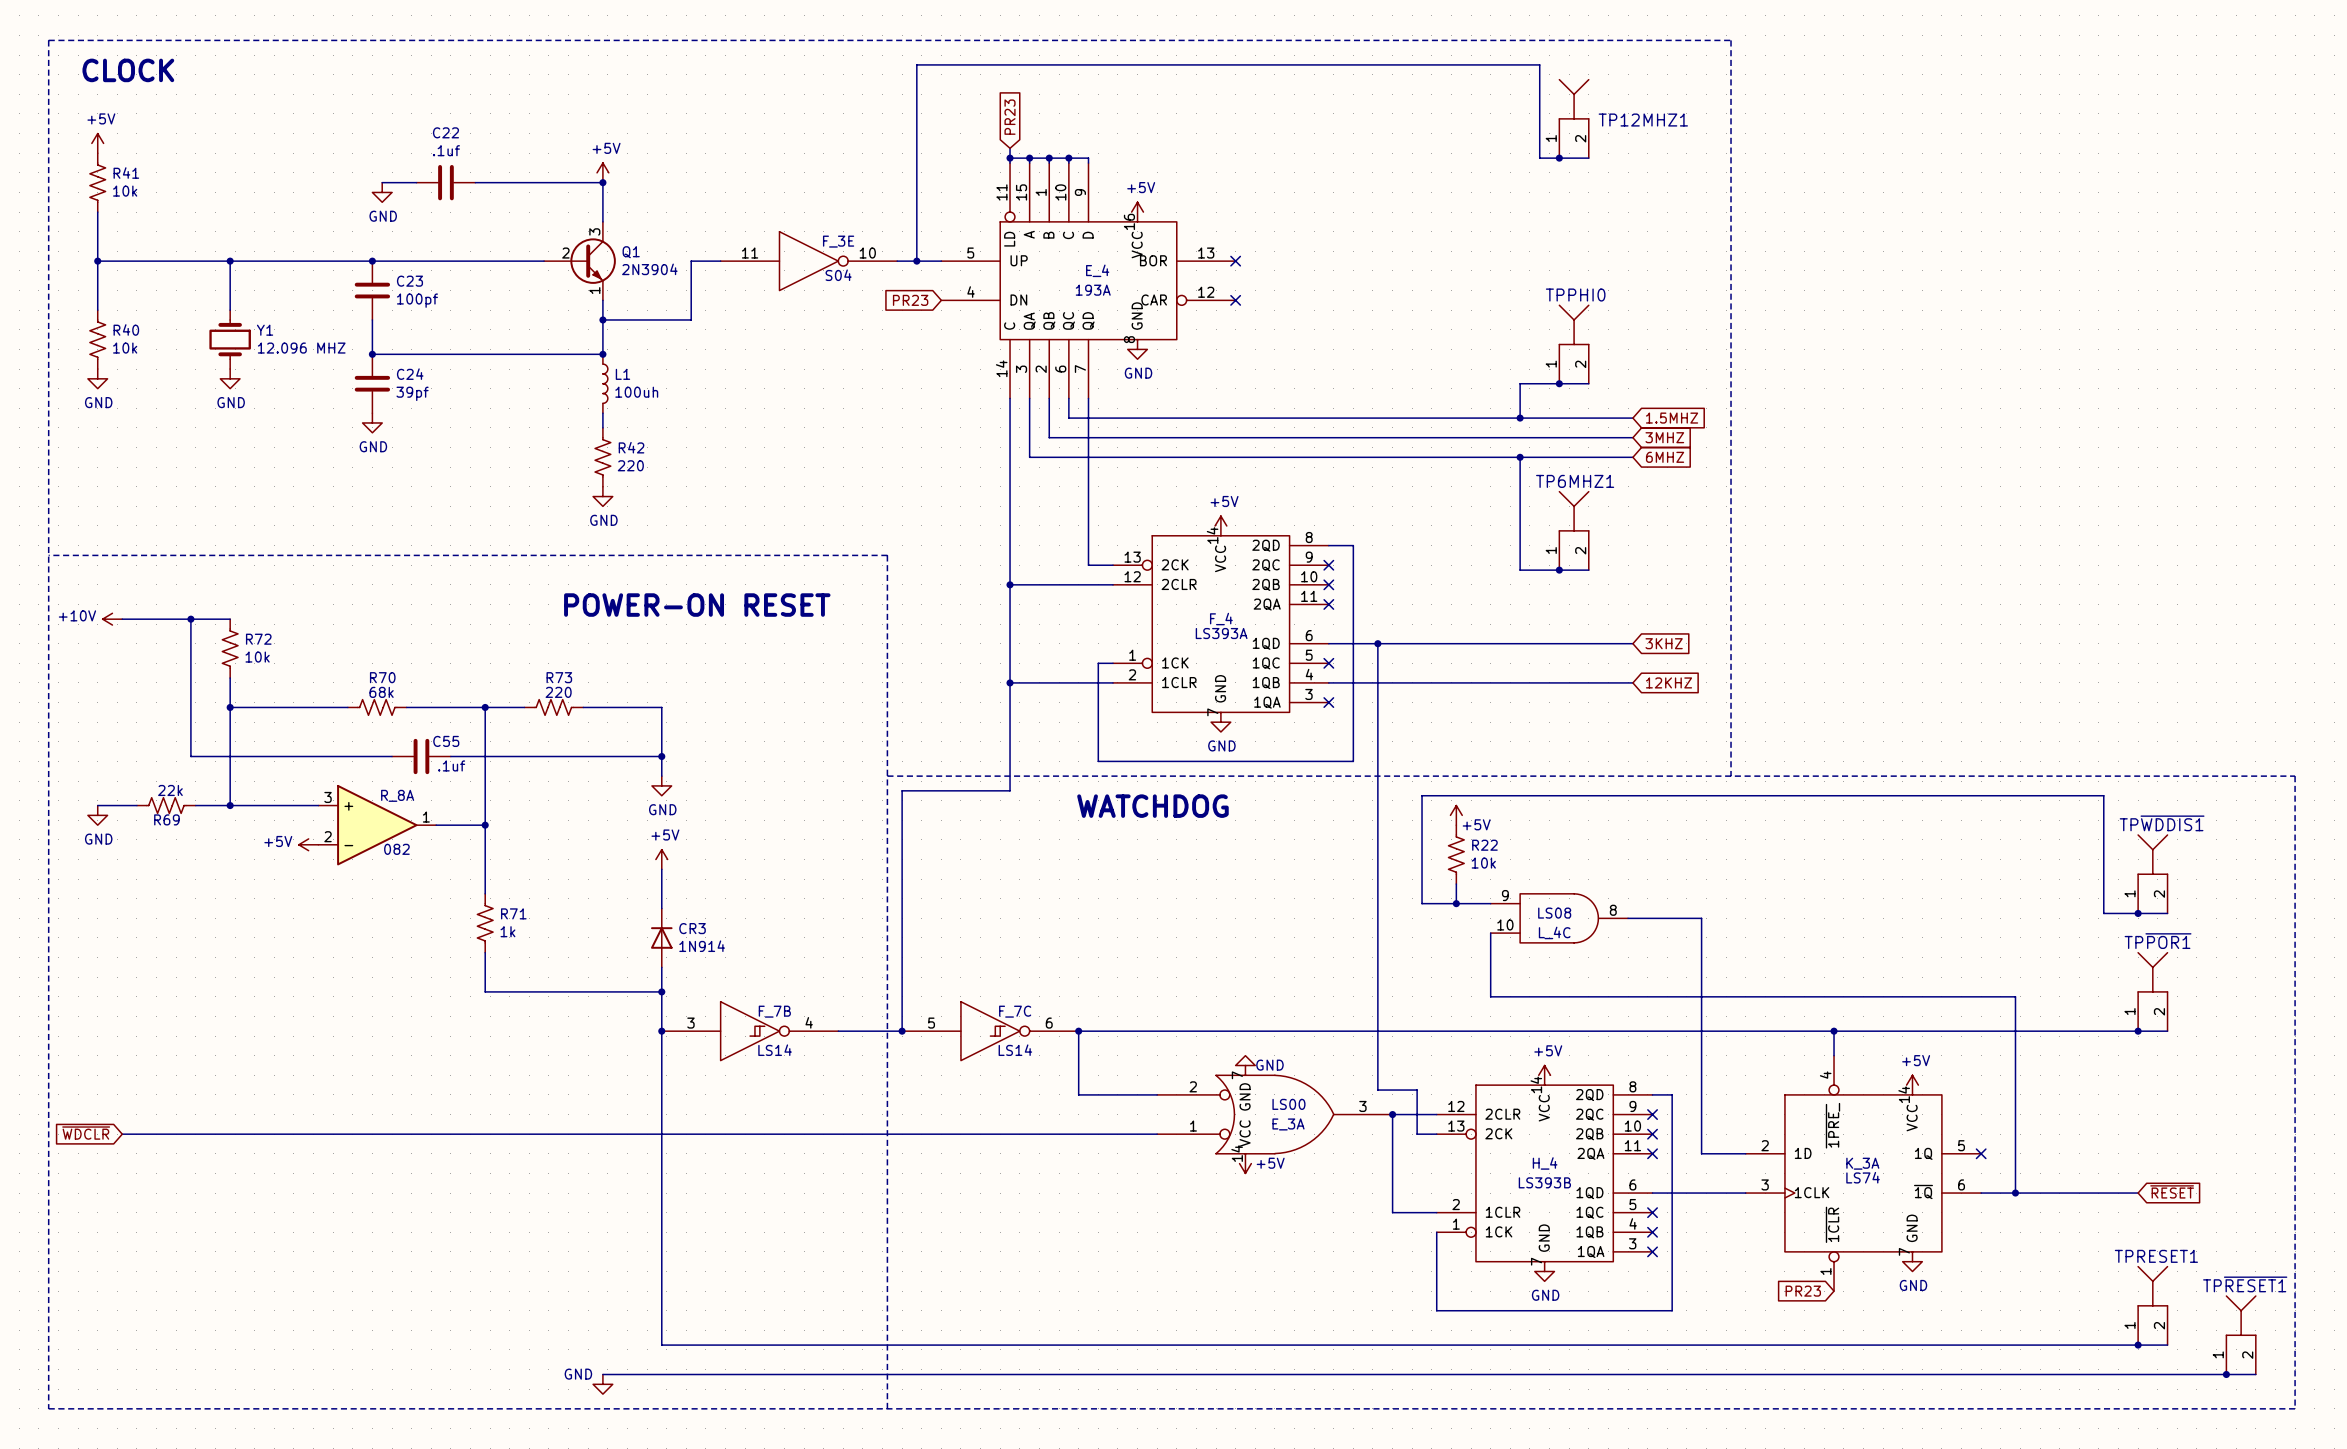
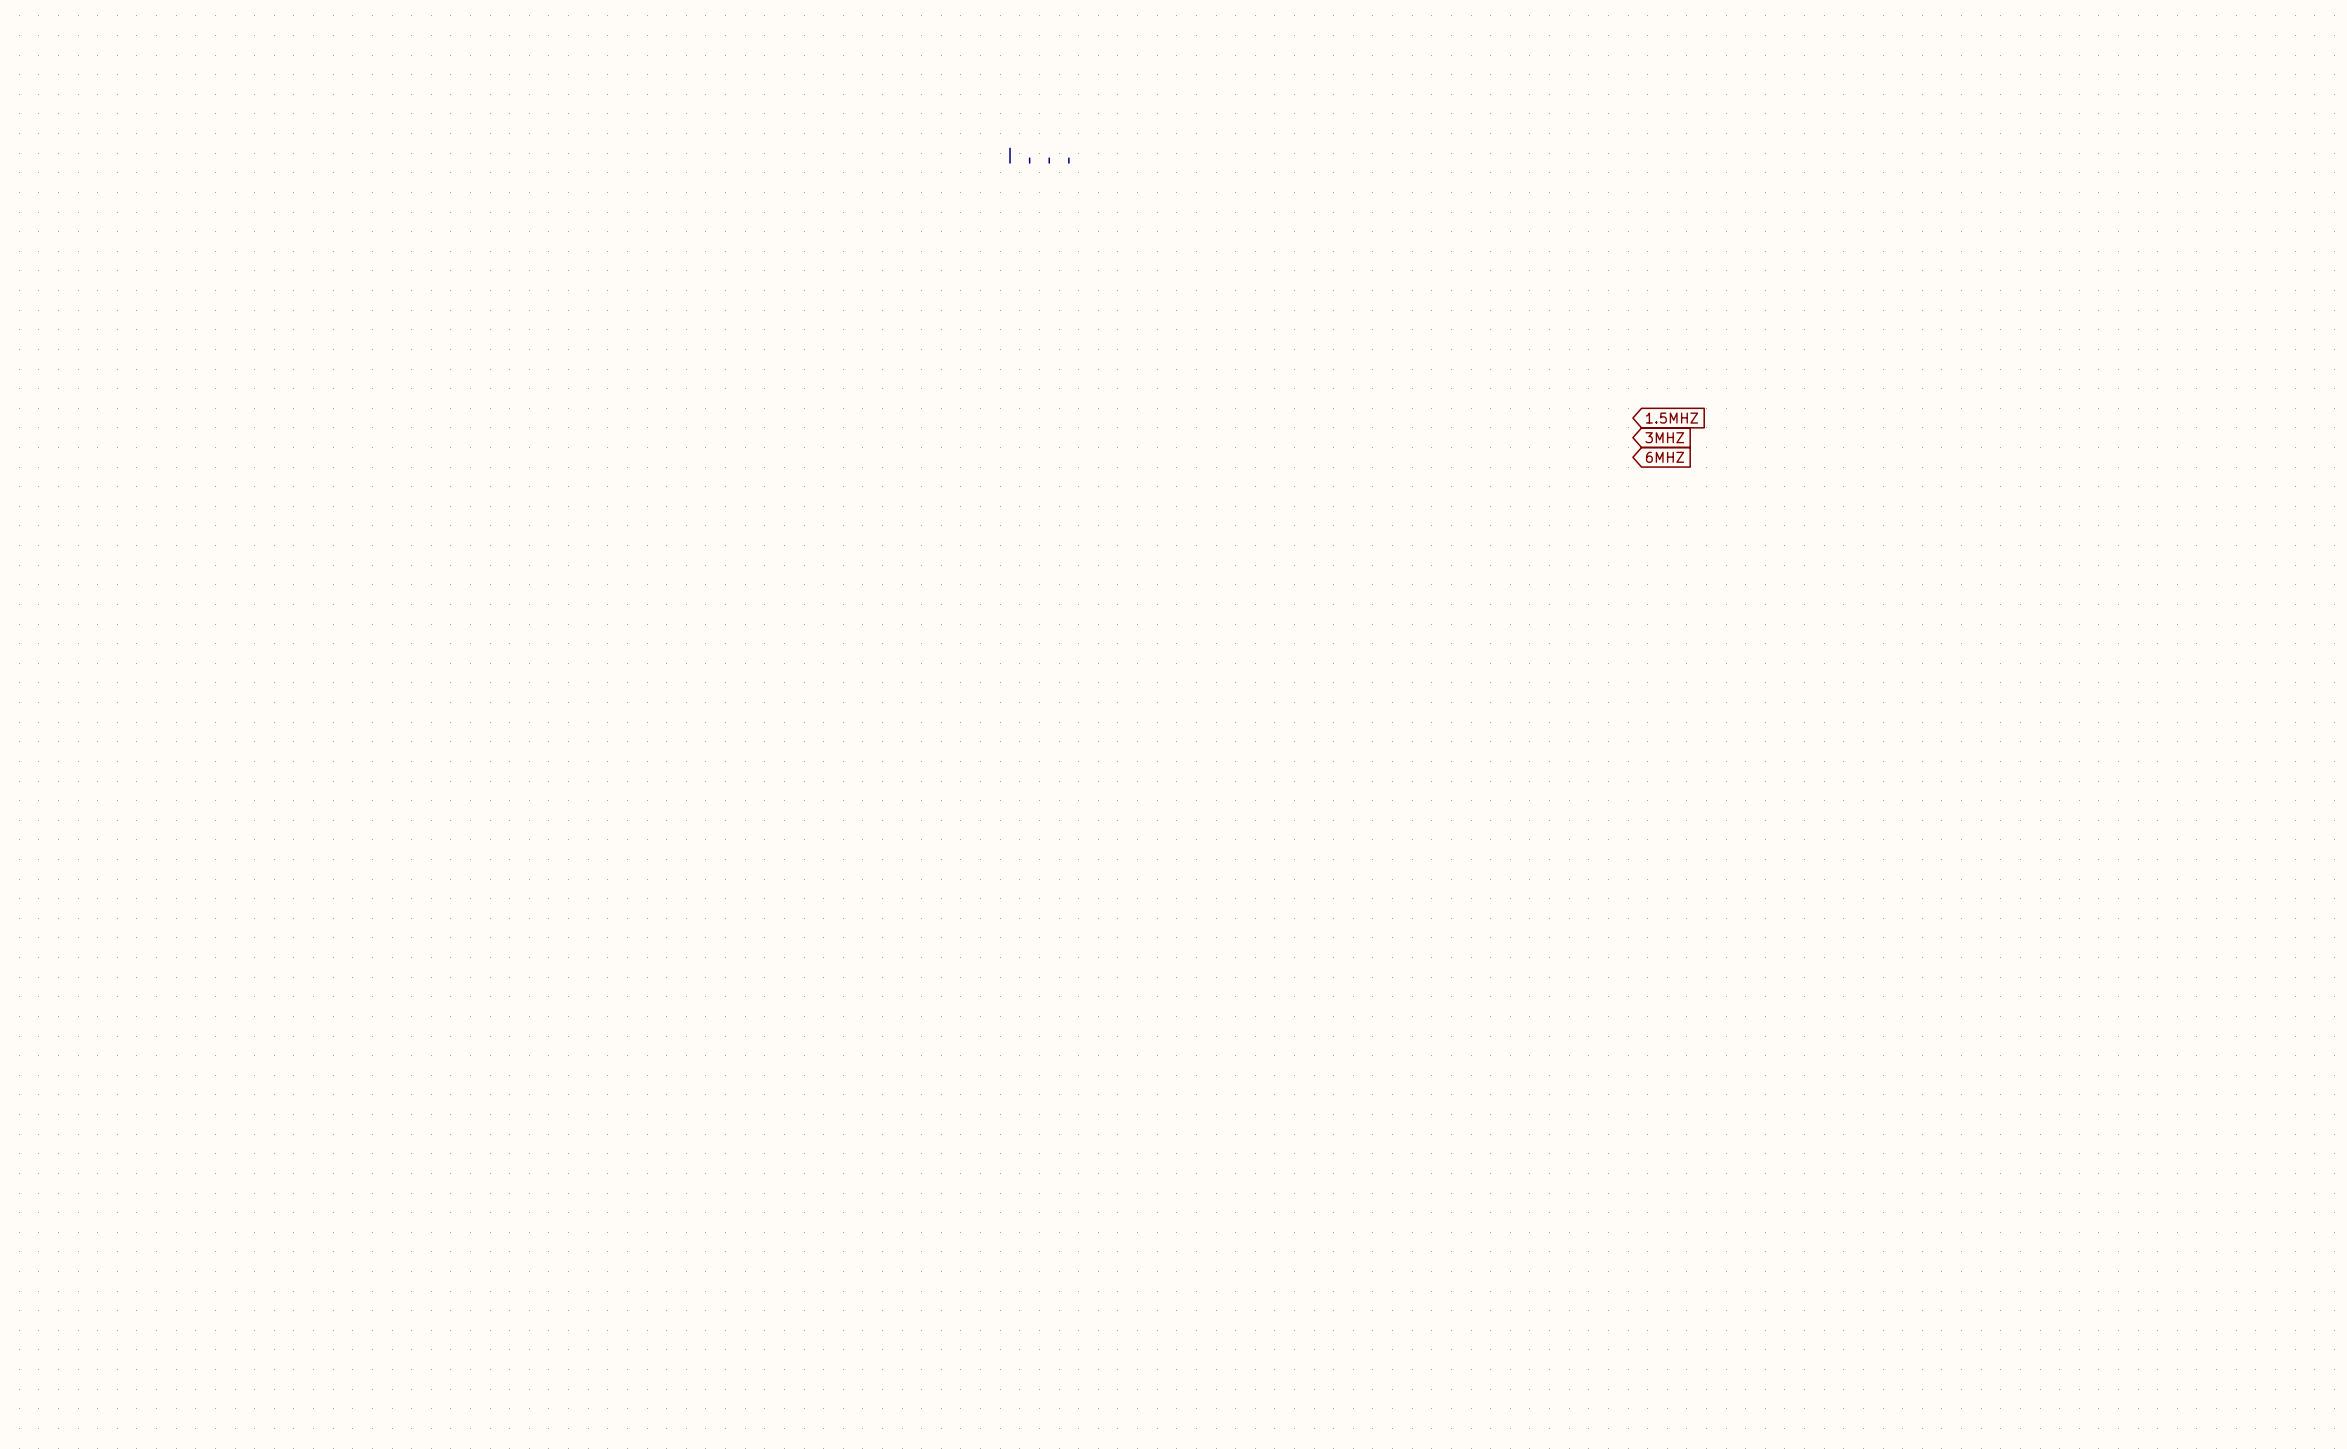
text: CLOCK (128, 70) -> none
global label: PR23 (1010, 117) -> none
TP12MHZ1: (1574, 118) -> none
power symbol: +5V (97, 143) -> none
wire: (1010, 158) (1088, 158) (1088, 163) -> none
junction: (1010, 158) -> none
junction: (1029, 158) -> none
junction: (1049, 158) -> none
junction: (1068, 158) -> none
junction: (1559, 158) -> none
wire: (1588, 158) (1539, 158) (1539, 64) (916, 64) (916, 261) -> none
power symbol: +5V (602, 172) -> none
R41: 10k (97, 182) -> none
wire: (382, 182) (416, 182) -> none
C22: .1uf (445, 182) -> none
wire: (475, 182) (602, 182) (602, 221) -> none
junction: (602, 182) -> none
power symbol: GND (382, 192) -> none
wire: (97, 212) (97, 310) -> none
power symbol: +5V (1137, 212) -> none
wire: (97, 261) (544, 261) -> none
junction: (97, 261) -> none
wire: (230, 261) (230, 310) -> none
junction: (230, 261) -> none
junction: (372, 261) -> none
Q1: 2N3904 (579, 261) -> none
wire: (720, 261) (691, 261) (691, 319) (602, 319) -> none
F_3E: S04 (808, 261) -> none
wire: (897, 261) (941, 261) -> none
junction: (916, 261) -> none
no-connect mark: (1235, 261) -> none
E_4: 193A (1088, 280) -> none
C23: 100pf (372, 290) -> none
wire: (602, 300) (602, 354) (372, 354) (372, 319) -> none
global label: PR23 (910, 300) -> none
no-connect mark: (1235, 300) -> none
junction: (602, 319) -> none
R40: 10k (97, 339) -> none
Y1: 12.096 MHZ (230, 339) -> none
TPPHI0: (1574, 344) -> none
power symbol: GND (1137, 349) -> none
junction: (372, 354) -> none
junction: (602, 354) -> none
power symbol: GND (97, 378) -> none
power symbol: GND (230, 378) -> none
C24: 39pf (372, 383) -> none
L1: 100uh (605, 383) -> none
junction: (1559, 383) -> none
wire: (1588, 383) (1520, 383) (1520, 418) -> none
wire: (1010, 398) (1010, 790) (902, 790) (902, 1031) (838, 1031) -> none
wire: (1029, 398) (1029, 457) (1632, 457) -> none
wire: (1049, 398) (1049, 437) (1632, 437) -> none
wire: (1068, 398) (1068, 418) (1632, 418) -> none
wire: (1088, 398) (1088, 565) (1113, 565) -> none
wire: (602, 413) (602, 427) -> none
junction: (1520, 418) -> none
power symbol: GND (372, 422) -> none
R42: 220 (602, 457) -> none
wire: (1520, 457) (1520, 570) (1588, 570) -> none
junction: (1520, 457) -> none
power symbol: GND (602, 496) -> none
power symbol: +5V (1220, 525) -> none
TP6MHZ1: (1574, 530) -> none
wire: (1328, 545) (1353, 545) (1353, 761) (1098, 761) (1098, 663) (1113, 663) -> none
line: (48, 555) (887, 555) (887, 1408) -> none
no-connect mark: (1328, 565) -> none
junction: (1559, 570) -> none
wire: (1010, 584) (1113, 584) -> none
junction: (1010, 584) -> none
no-connect mark: (1328, 584) -> none
no-connect mark: (1328, 604) -> none
text: POWER-ON RESET (697, 605) -> none
power symbol: +10V (112, 619) -> none
wire: (122, 619) (230, 619) -> none
wire: (190, 619) (190, 756) (392, 756) -> none
junction: (190, 619) -> none
F_4: LS393A (1220, 624) -> none
wire: (1328, 643) (1632, 643) -> none
wire: (1377, 643) (1377, 1090) (1417, 1090) (1417, 1134) (1436, 1134) -> none
junction: (1377, 643) -> none
global label: 3KHZ (1664, 643) -> none
R72: 10k (230, 648) -> none
no-connect mark: (1328, 663) -> none
wire: (230, 678) (230, 805) -> none
wire: (1010, 682) (1113, 682) -> none
junction: (1010, 682) -> none
wire: (1328, 682) (1632, 682) -> none
global label: 12KHZ (1669, 682) -> none
no-connect mark: (1328, 702) -> none
wire: (230, 707) (347, 707) -> none
junction: (230, 707) -> none
R70: 68k (377, 707) -> none
wire: (406, 707) (524, 707) -> none
wire: (485, 707) (485, 893) -> none
junction: (485, 707) -> none
R73: 220 (553, 707) -> none
wire: (583, 707) (661, 707) (661, 776) -> none
power symbol: GND (1220, 722) -> none
C55: .1uf (421, 756) -> none
wire: (450, 756) (661, 756) -> none
junction: (661, 756) -> none
line: (887, 776) (2295, 776) (2295, 1408) (48, 1408) (48, 40) (1731, 40) (1731, 776) -> none
power symbol: GND (661, 785) -> none
wire: (97, 805) (136, 805) -> none
R69: 22k (166, 805) -> none
wire: (195, 805) (318, 805) -> none
junction: (230, 805) -> none
text: WATCHDOG (1152, 806) -> none
power symbol: GND (97, 815) -> none
power symbol: +5V (1456, 815) -> none
R_8A: 082 (377, 825) -> none
wire: (436, 825) (485, 825) -> none
junction: (485, 825) -> none
power symbol: +5V (308, 844) -> none
R22: 10k (1456, 854) -> none
power symbol: +5V (661, 859) -> none
wire: (661, 869) (661, 908) -> none
TP~{WDDIS1}: (2152, 874) -> none
wire: (1456, 884) (1456, 903) -> none
junction: (1456, 903) -> none
wire: (1490, 903) (1422, 903) (1422, 795) (2103, 795) (2103, 913) (2167, 913) -> none
junction: (2138, 913) -> none
L_4C: LS08 (1559, 918) -> none
wire: (1628, 918) (1701, 918) (1701, 1153) (1745, 1153) -> none
R71: 1k (485, 923) -> none
wire: (1490, 933) (1490, 996) (2015, 996) (2015, 1193) -> none
CR3: 1N914 (661, 937) -> none
wire: (485, 952) (485, 991) (661, 991) -> none
wire: (661, 967) (661, 1345) (2167, 1345) -> none
junction: (661, 991) -> none
TP~{POR1}: (2152, 991) -> none
junction: (661, 1031) -> none
F_7B: LS14 (750, 1031) -> none
junction: (902, 1031) -> none
F_7C: LS14 (990, 1031) -> none
junction: (1078, 1031) -> none
wire: (1834, 1031) (1834, 1055) -> none
junction: (1834, 1031) -> none
junction: (2138, 1031) -> none
wire: (2167, 1031) (1078, 1031) (1078, 1094) (1157, 1094) -> none
power symbol: GND (1245, 1065) -> none
power symbol: +5V (1544, 1075) -> none
power symbol: +5V (1912, 1085) -> none
wire: (1652, 1094) (1672, 1094) (1672, 1310) (1436, 1310) (1436, 1232) -> none
E_3A: LS00 (1274, 1114) -> none
junction: (1392, 1114) -> none
wire: (1436, 1114) (1392, 1114) (1392, 1212) (1436, 1212) -> none
no-connect mark: (1652, 1114) -> none
global label: ~{WDCLR} (86, 1133) -> none
wire: (122, 1134) (1157, 1134) -> none
no-connect mark: (1652, 1134) -> none
no-connect mark: (1652, 1153) -> none
no-connect mark: (1981, 1153) -> none
power symbol: +5V (1245, 1163) -> none
H_4: LS393B (1544, 1173) -> none
K_3A: LS74 (1863, 1173) -> none
global label: ~{RESET} (2172, 1191) -> none
wire: (1652, 1193) (1745, 1193) -> none
wire: (1981, 1193) (2138, 1193) -> none
junction: (2015, 1193) -> none
no-connect mark: (1652, 1212) -> none
no-connect mark: (1652, 1232) -> none
no-connect mark: (1652, 1251) -> none
power symbol: GND (1912, 1261) -> none
power symbol: GND (1544, 1271) -> none
global label: PR23 (1803, 1291) -> none
TPRESET1: (2152, 1305) -> none
TP~{RESET1}: (2241, 1335) -> none
junction: (2138, 1345) -> none
wire: (602, 1374) (2255, 1374) -> none
junction: (2226, 1374) -> none
power symbol: GND (602, 1384) -> none

